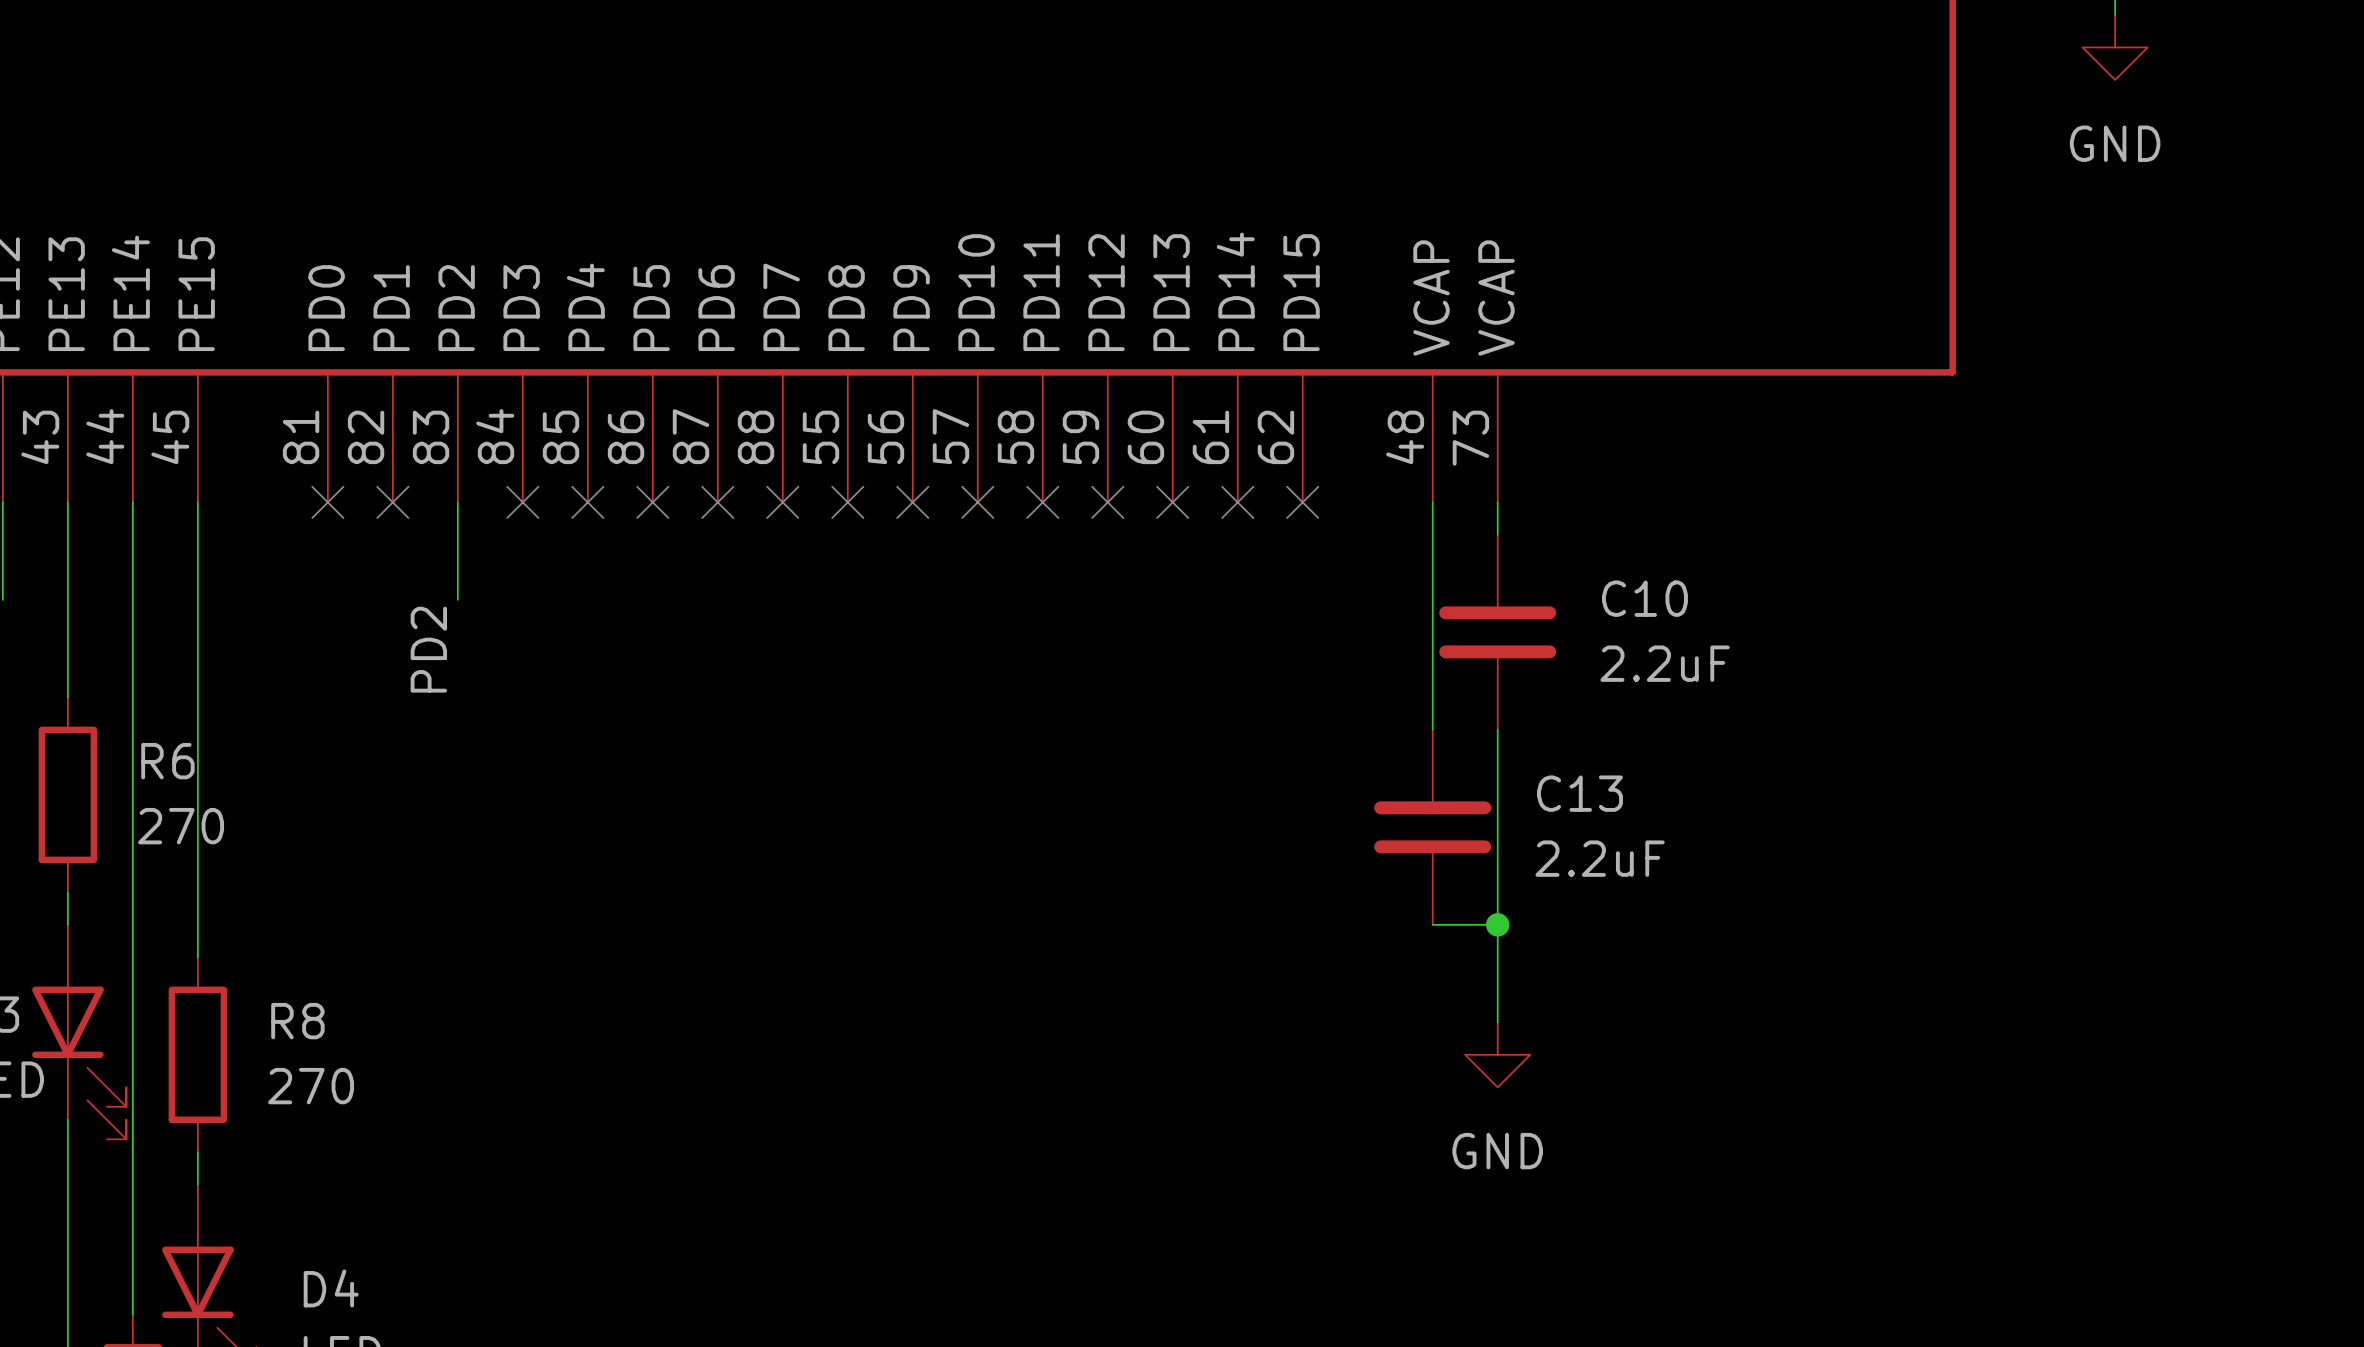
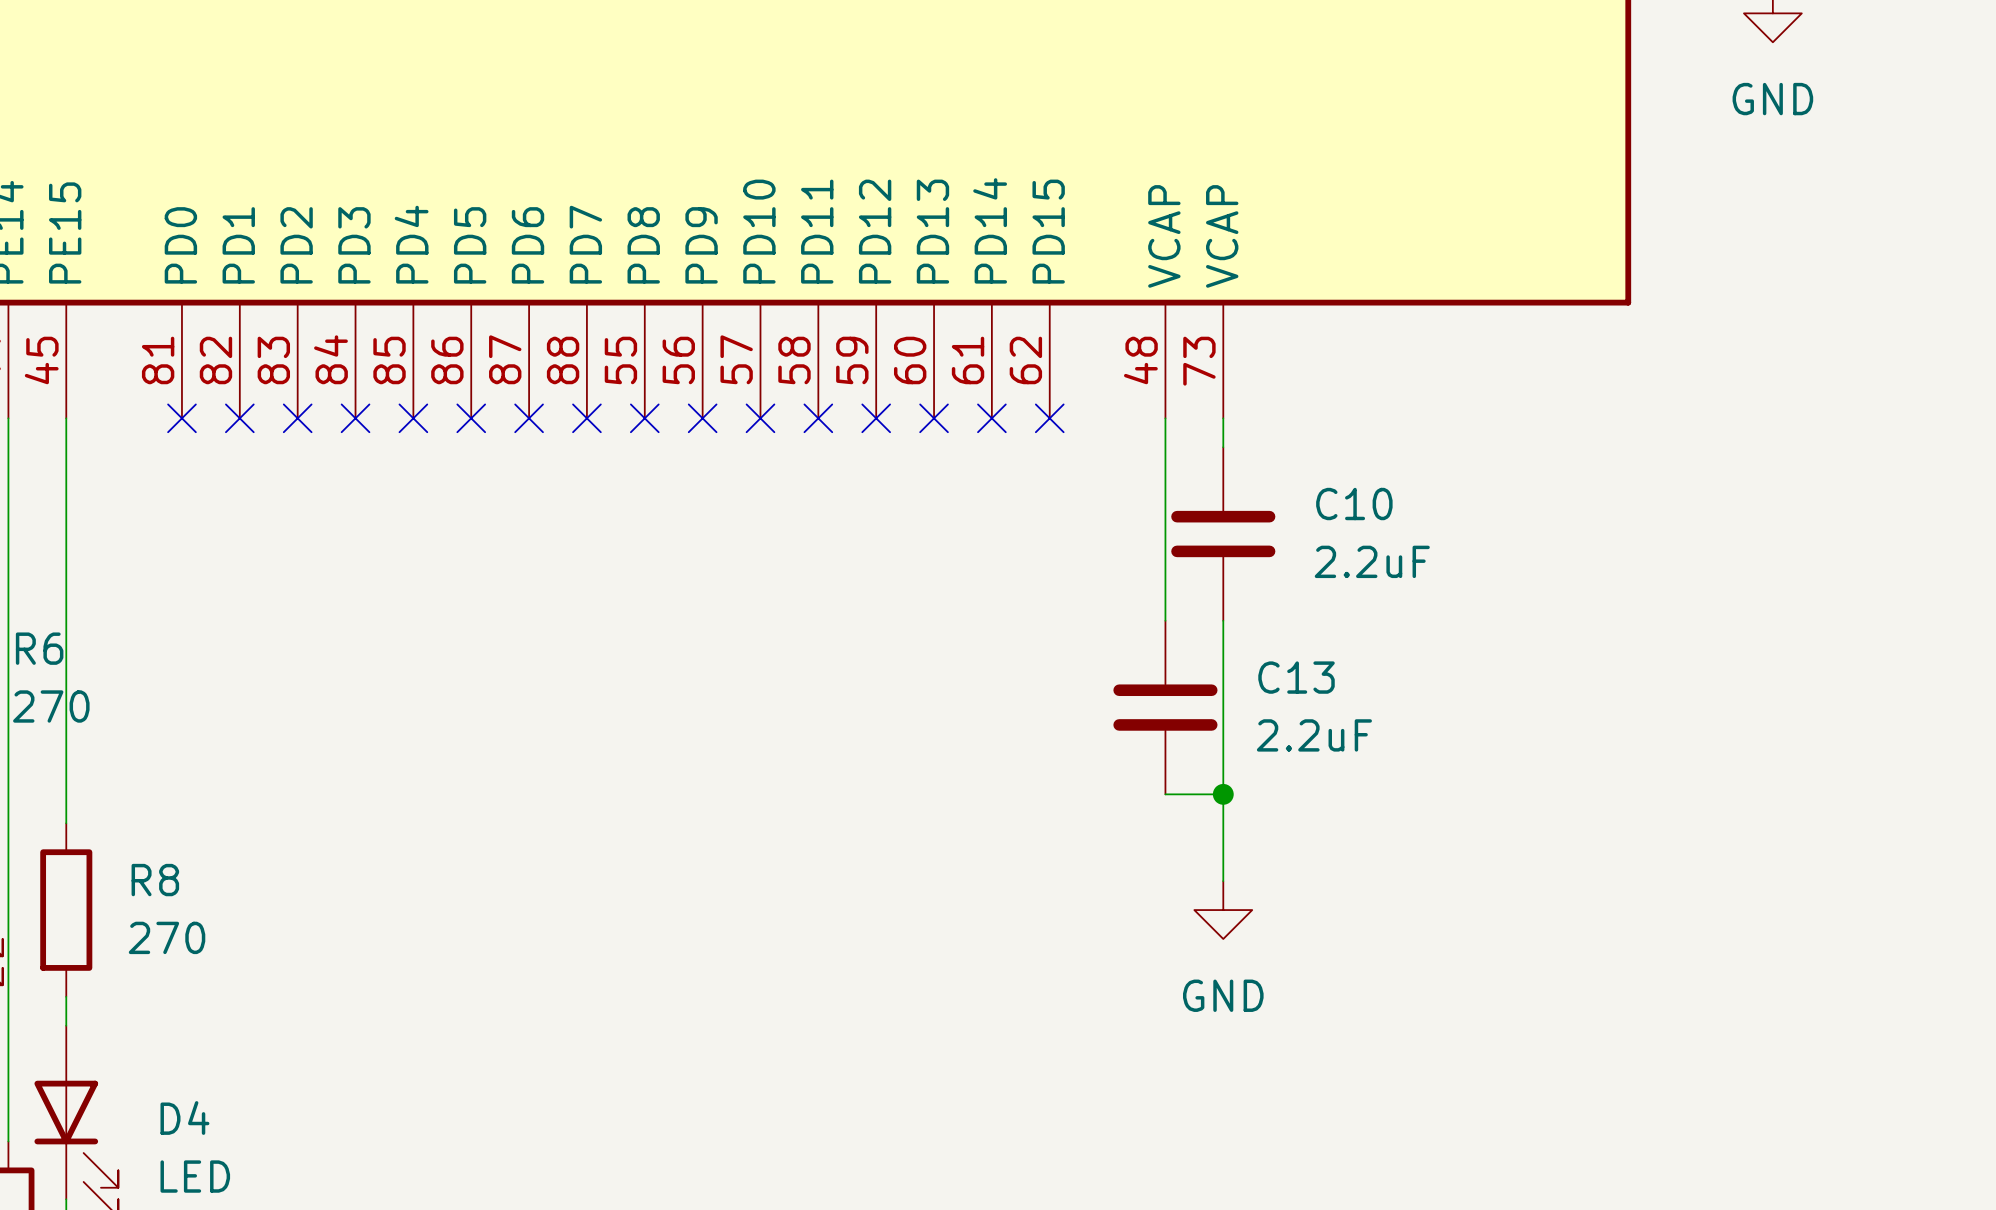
wire: (457, 502) (457, 599) -> none
no-connect mark: none -> (297, 418)
label: PD2 (428, 649) -> none

